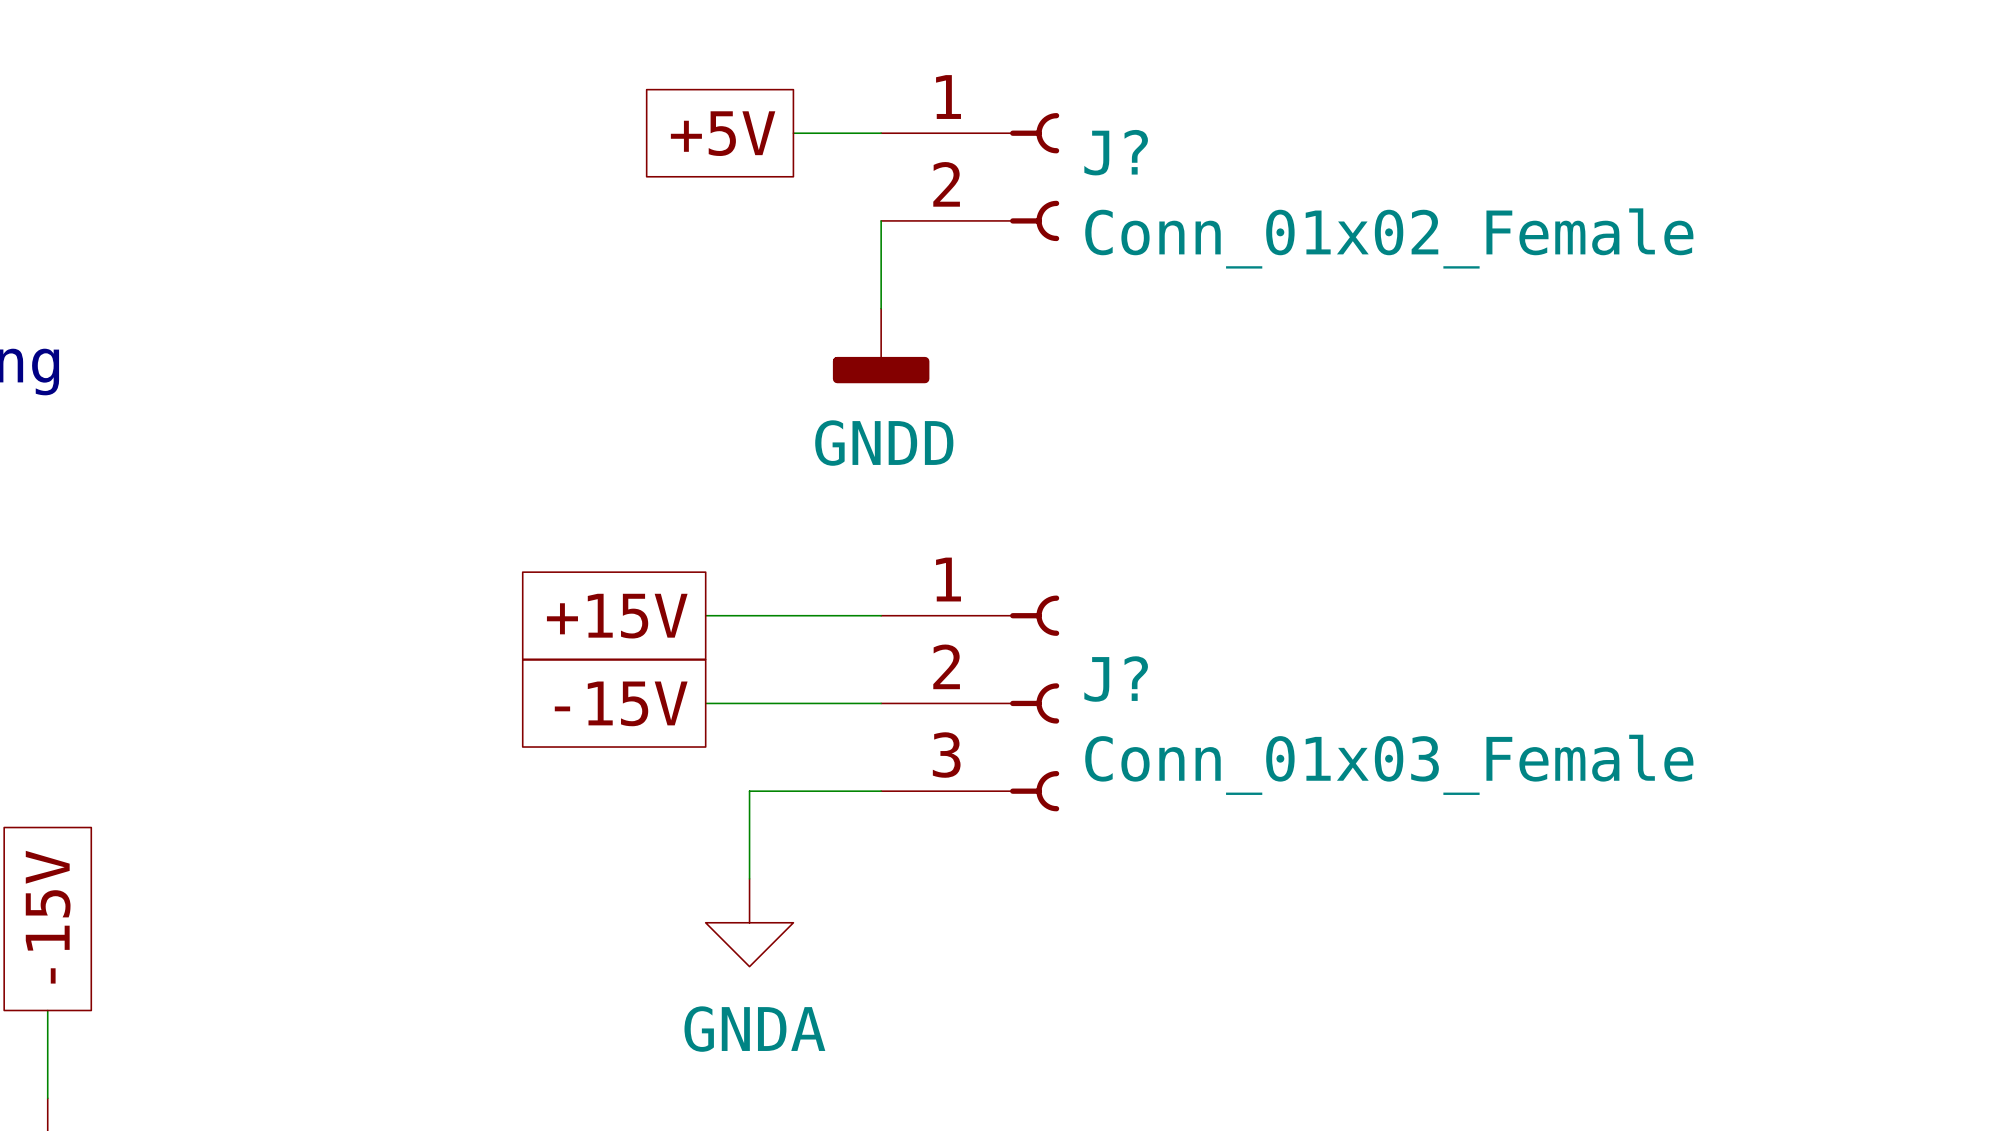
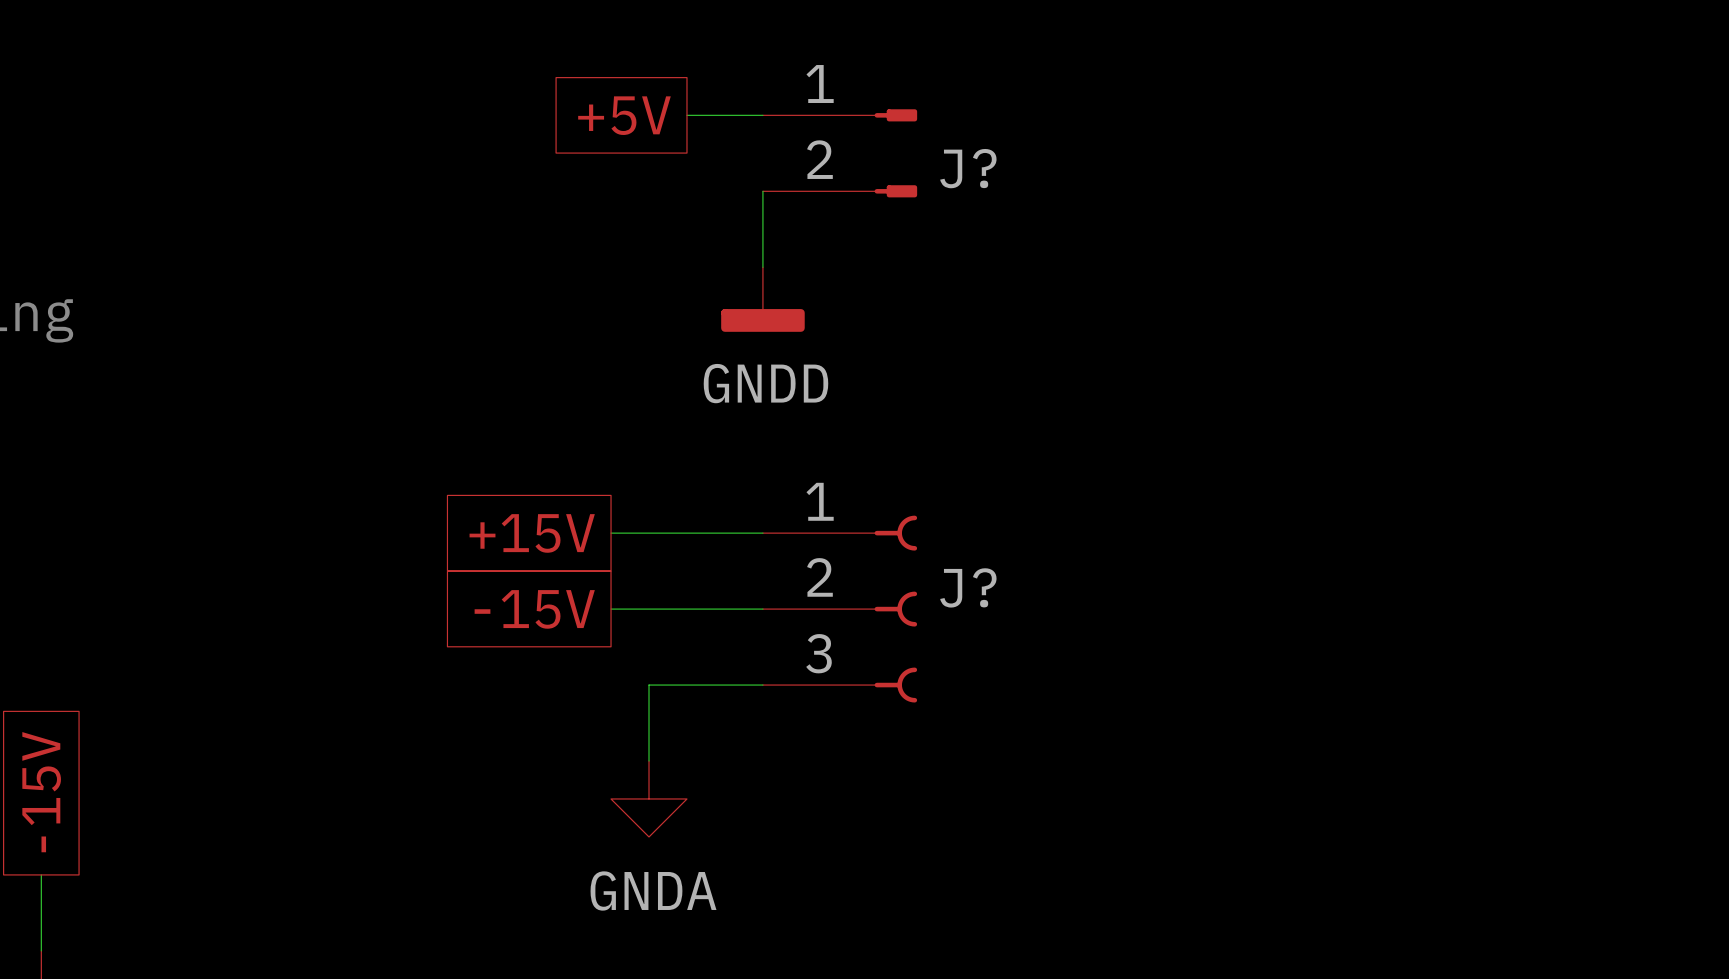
J? symbol: [881, 113, 1060, 242] -> [762, 109, 918, 198]
J? name position: J? (1116, 152) -> J? (968, 168)
J? value: Conn_01x02_Female (1389, 238) -> none
J? value: Conn_01x03_Female (1389, 764) -> none

